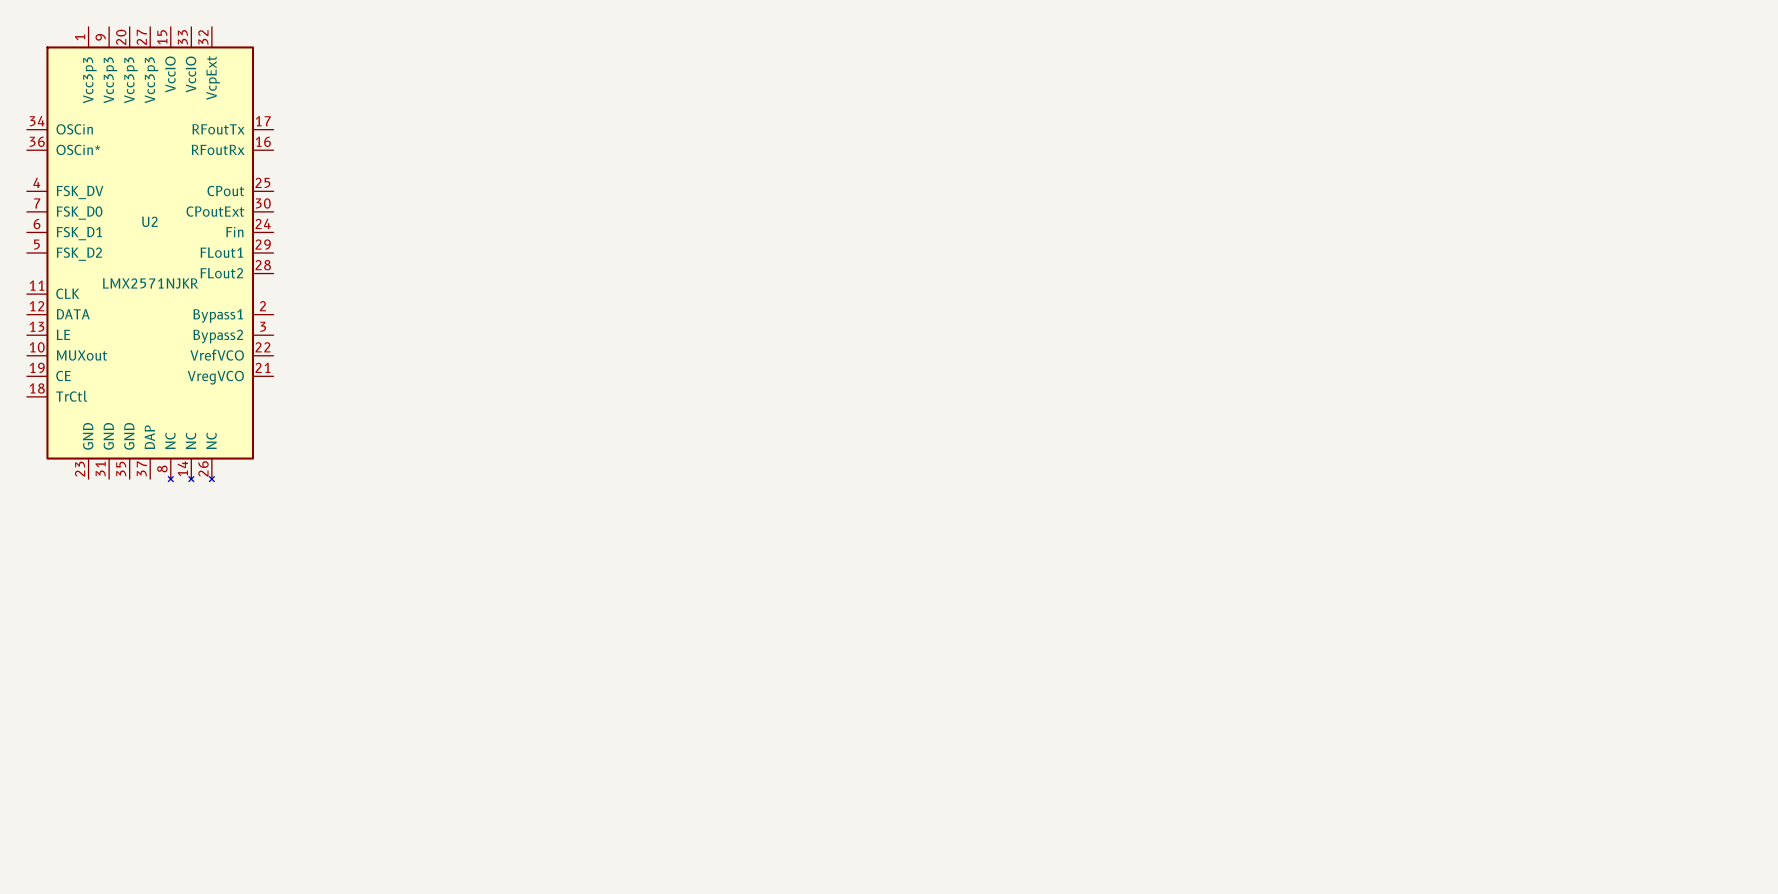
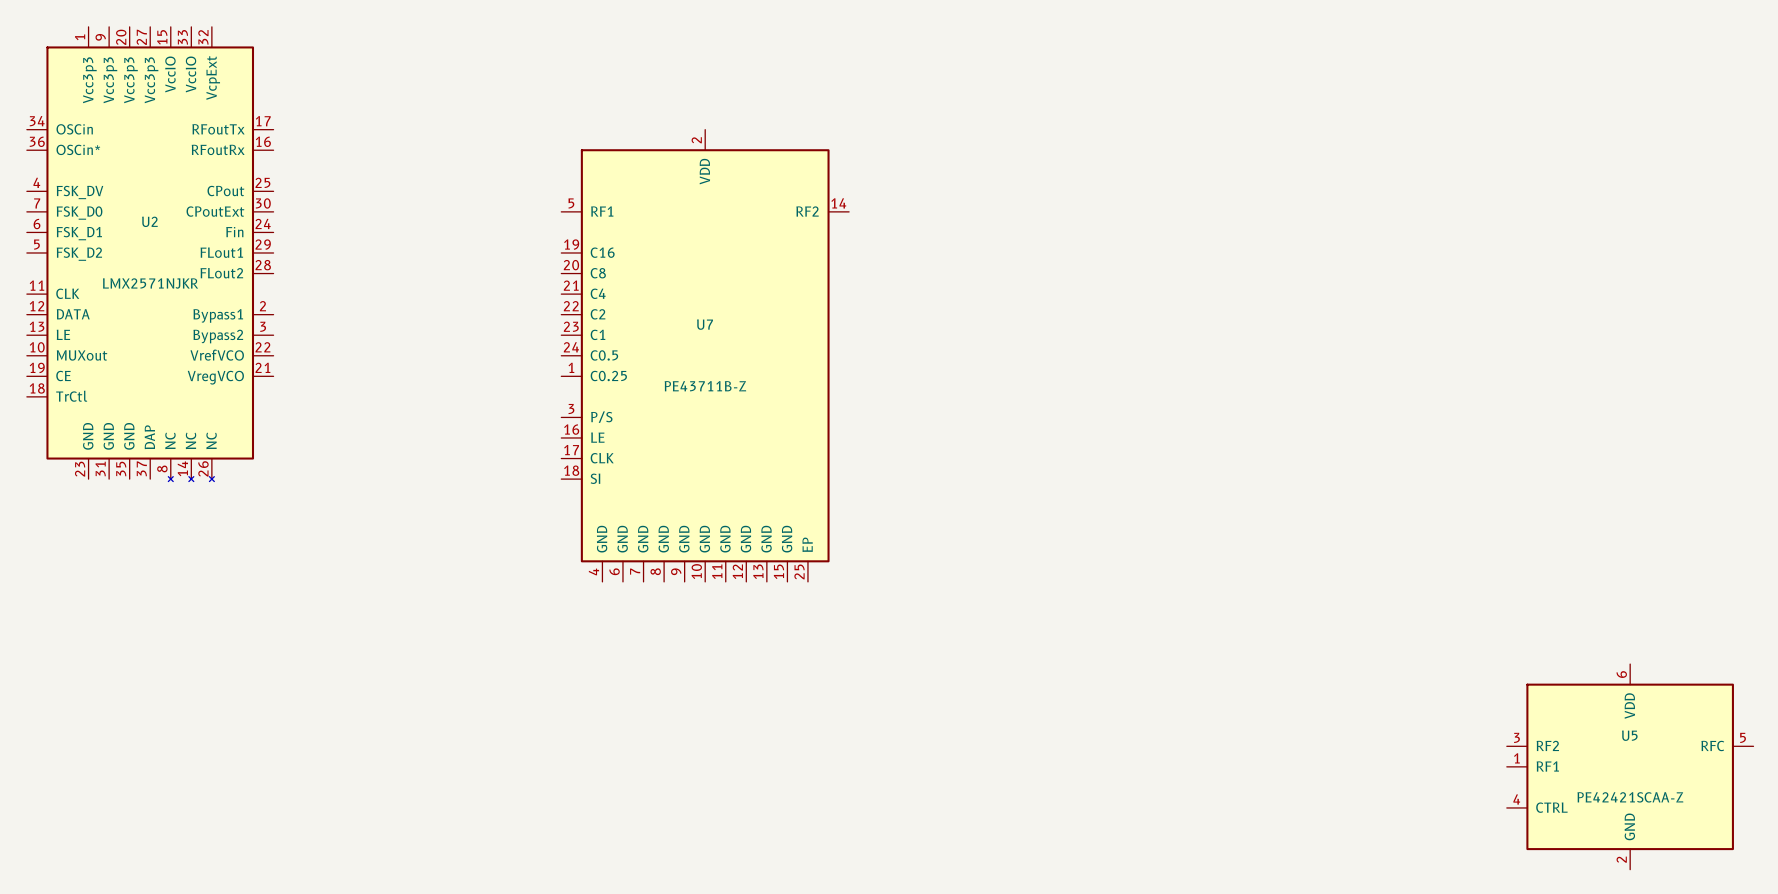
U7: none -> PE43711B-Z (705, 355)
U5: none -> PE42421SCAA-Z (1630, 766)

